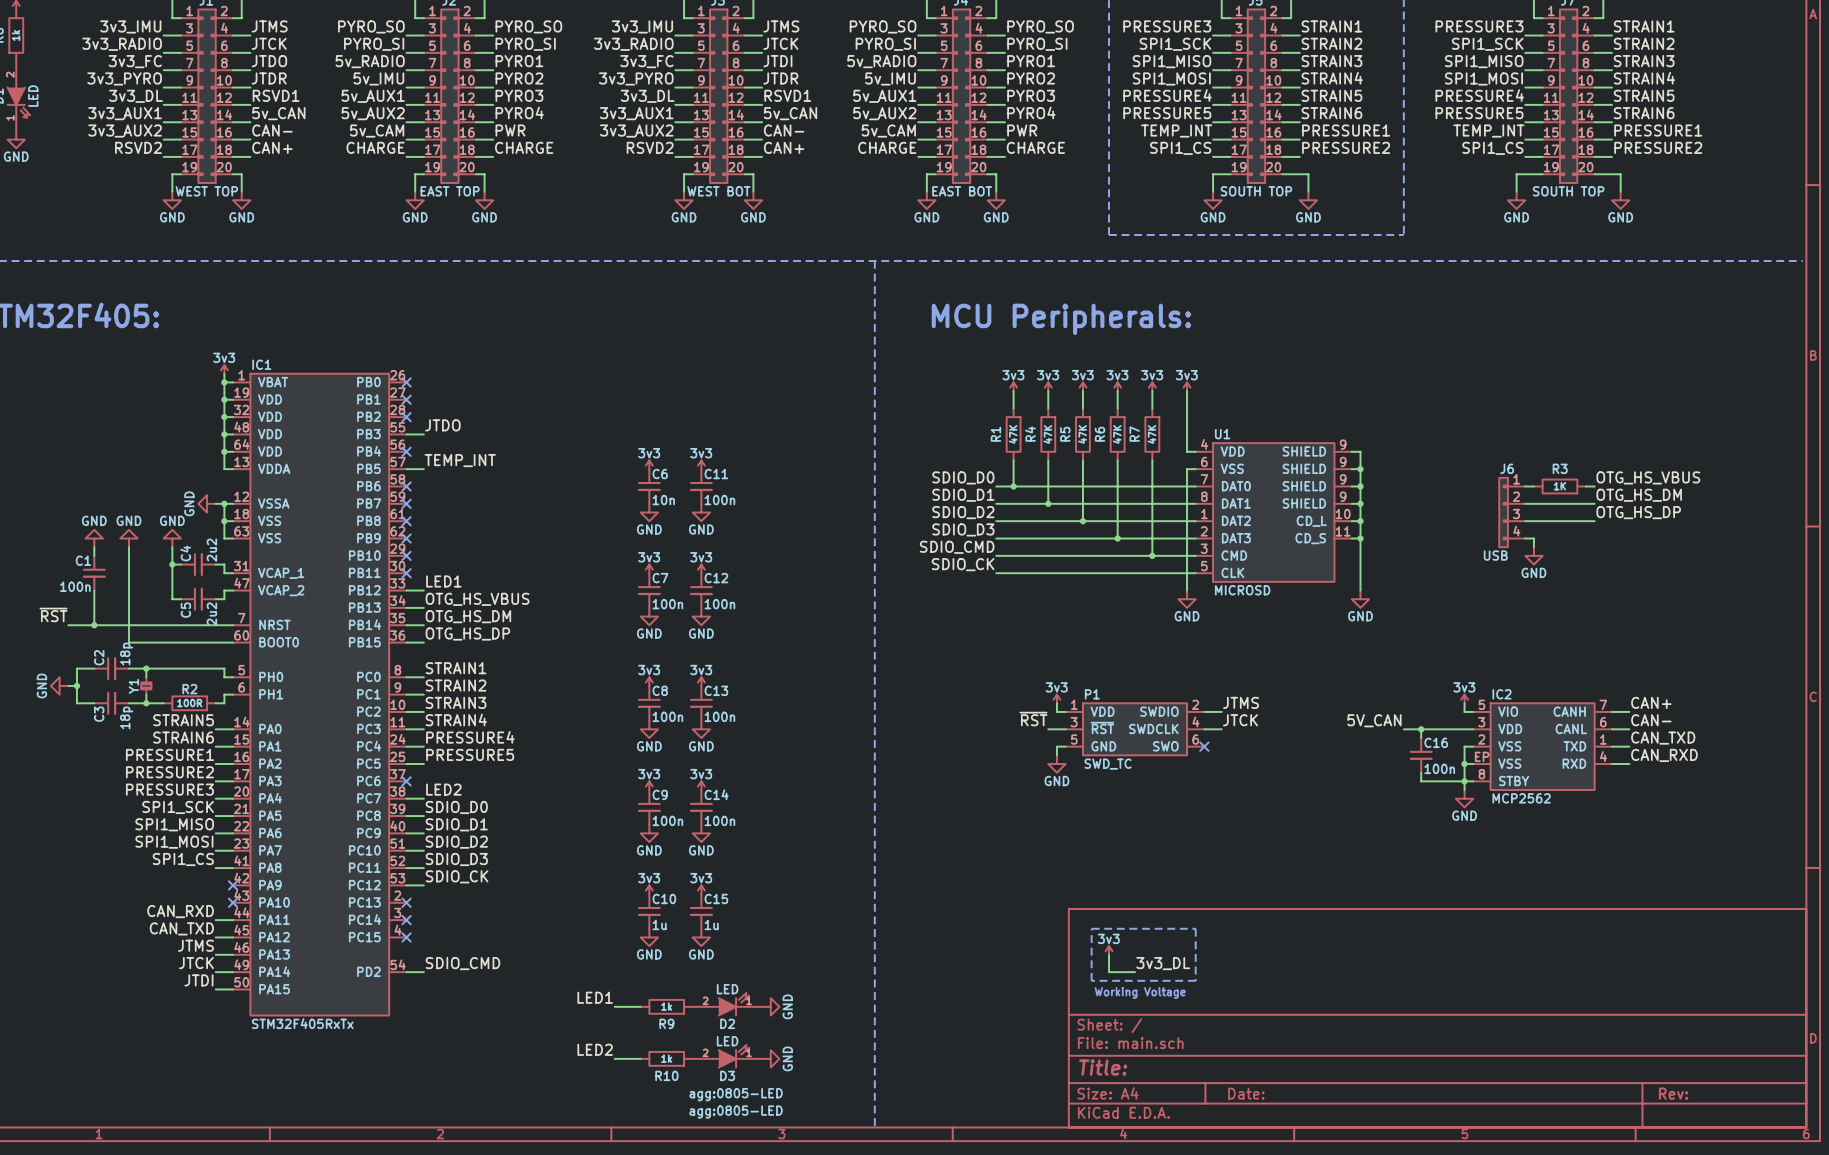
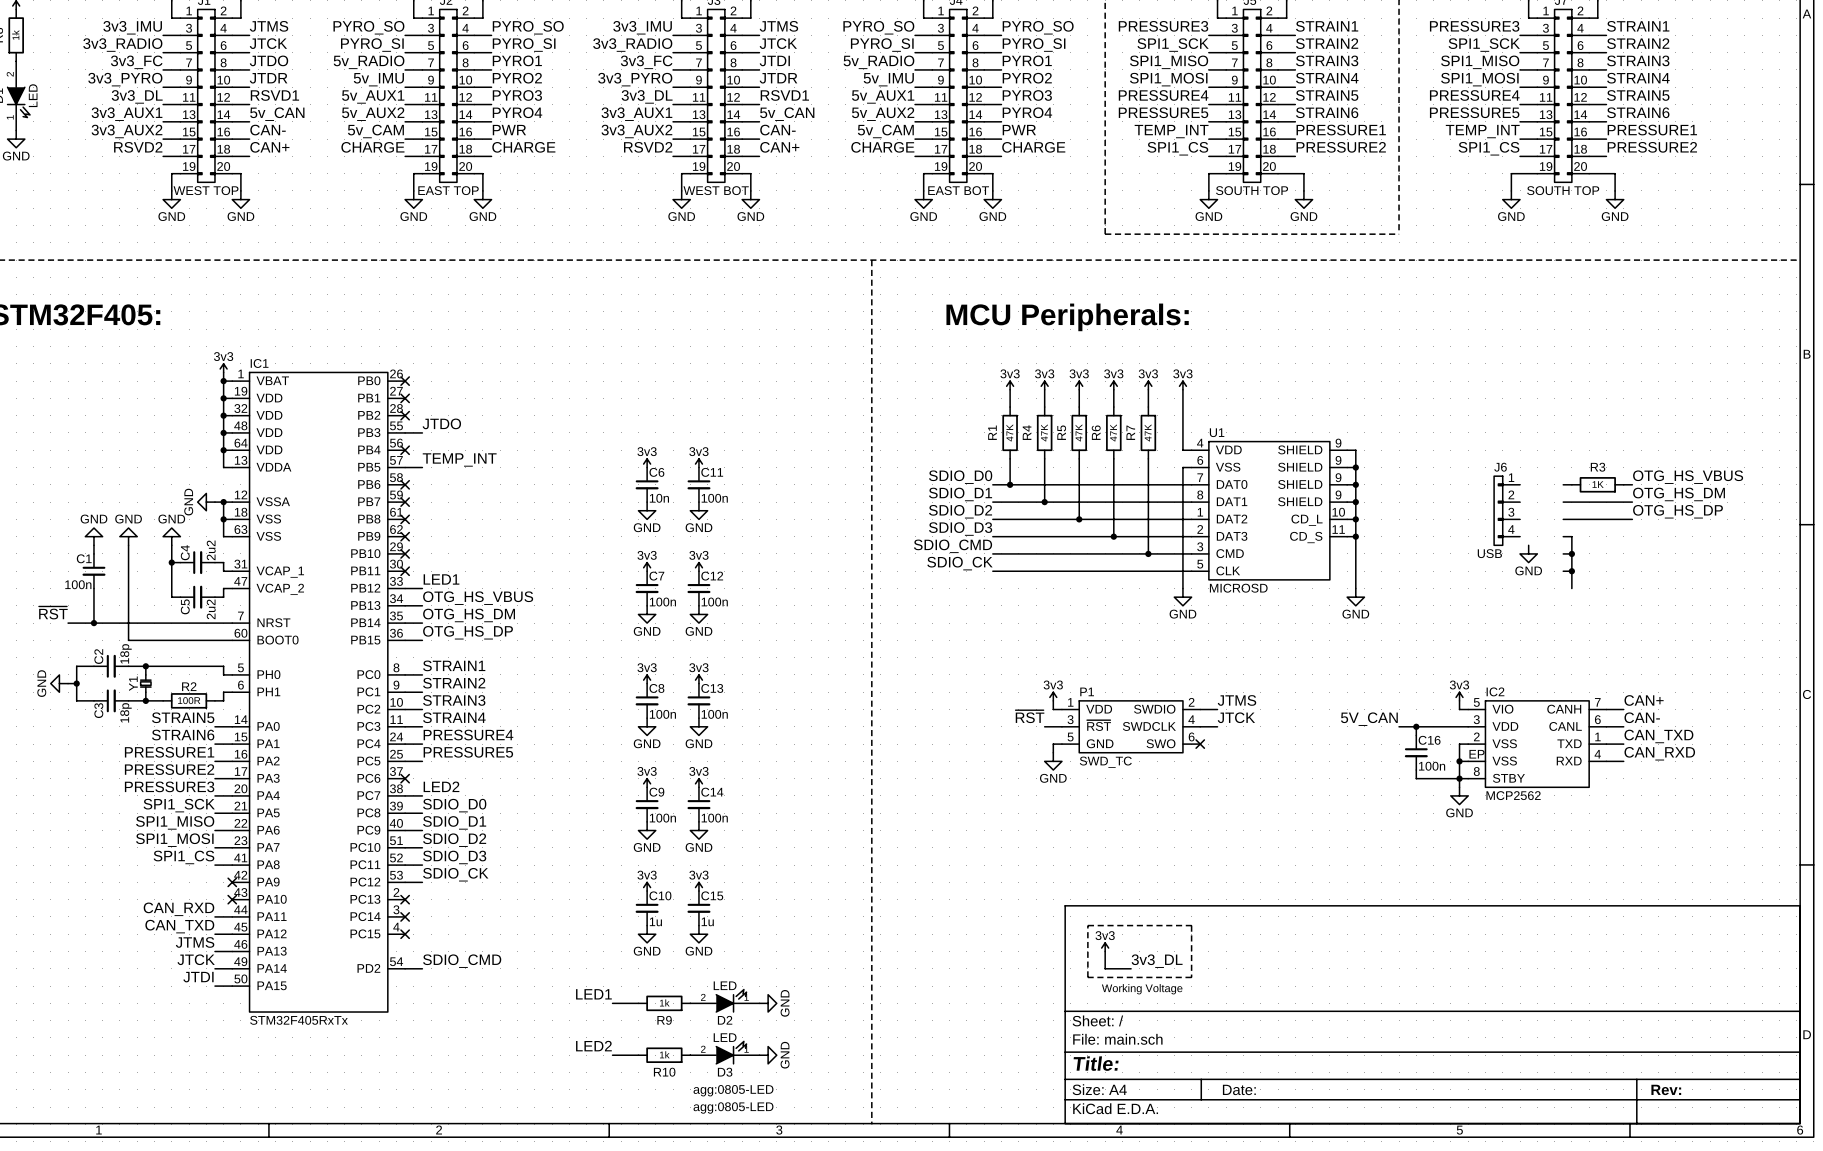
label position: OTG_HS_VBUS (1648, 477) -> OTG_HS_VBUS (1688, 477)
wire: (1525, 486) (1533, 486) -> (1563, 484) (1571, 484)
R3 position: (1559, 486) -> (1597, 484)
wire: (1585, 486) (1594, 486) -> (1623, 484) (1632, 484)
label position: OTG_HS_DM (1639, 495) -> OTG_HS_DM (1679, 494)
wire: (1525, 503) (1568, 503) -> (1589, 502) (1632, 502)
label position: OTG_HS_DP (1638, 512) -> OTG_HS_DP (1677, 511)
wire: (1525, 521) (1568, 521) -> (1589, 519) (1632, 519)
wire: (1525, 538) (1533, 538) (1533, 547) -> none
wire: none -> (1563, 536) (1571, 536) (1571, 588)
wire: none -> (1563, 553) (1571, 553)
junction: none -> (1571, 553)
wire: none -> (1563, 571) (1571, 571)
junction: none -> (1571, 571)

